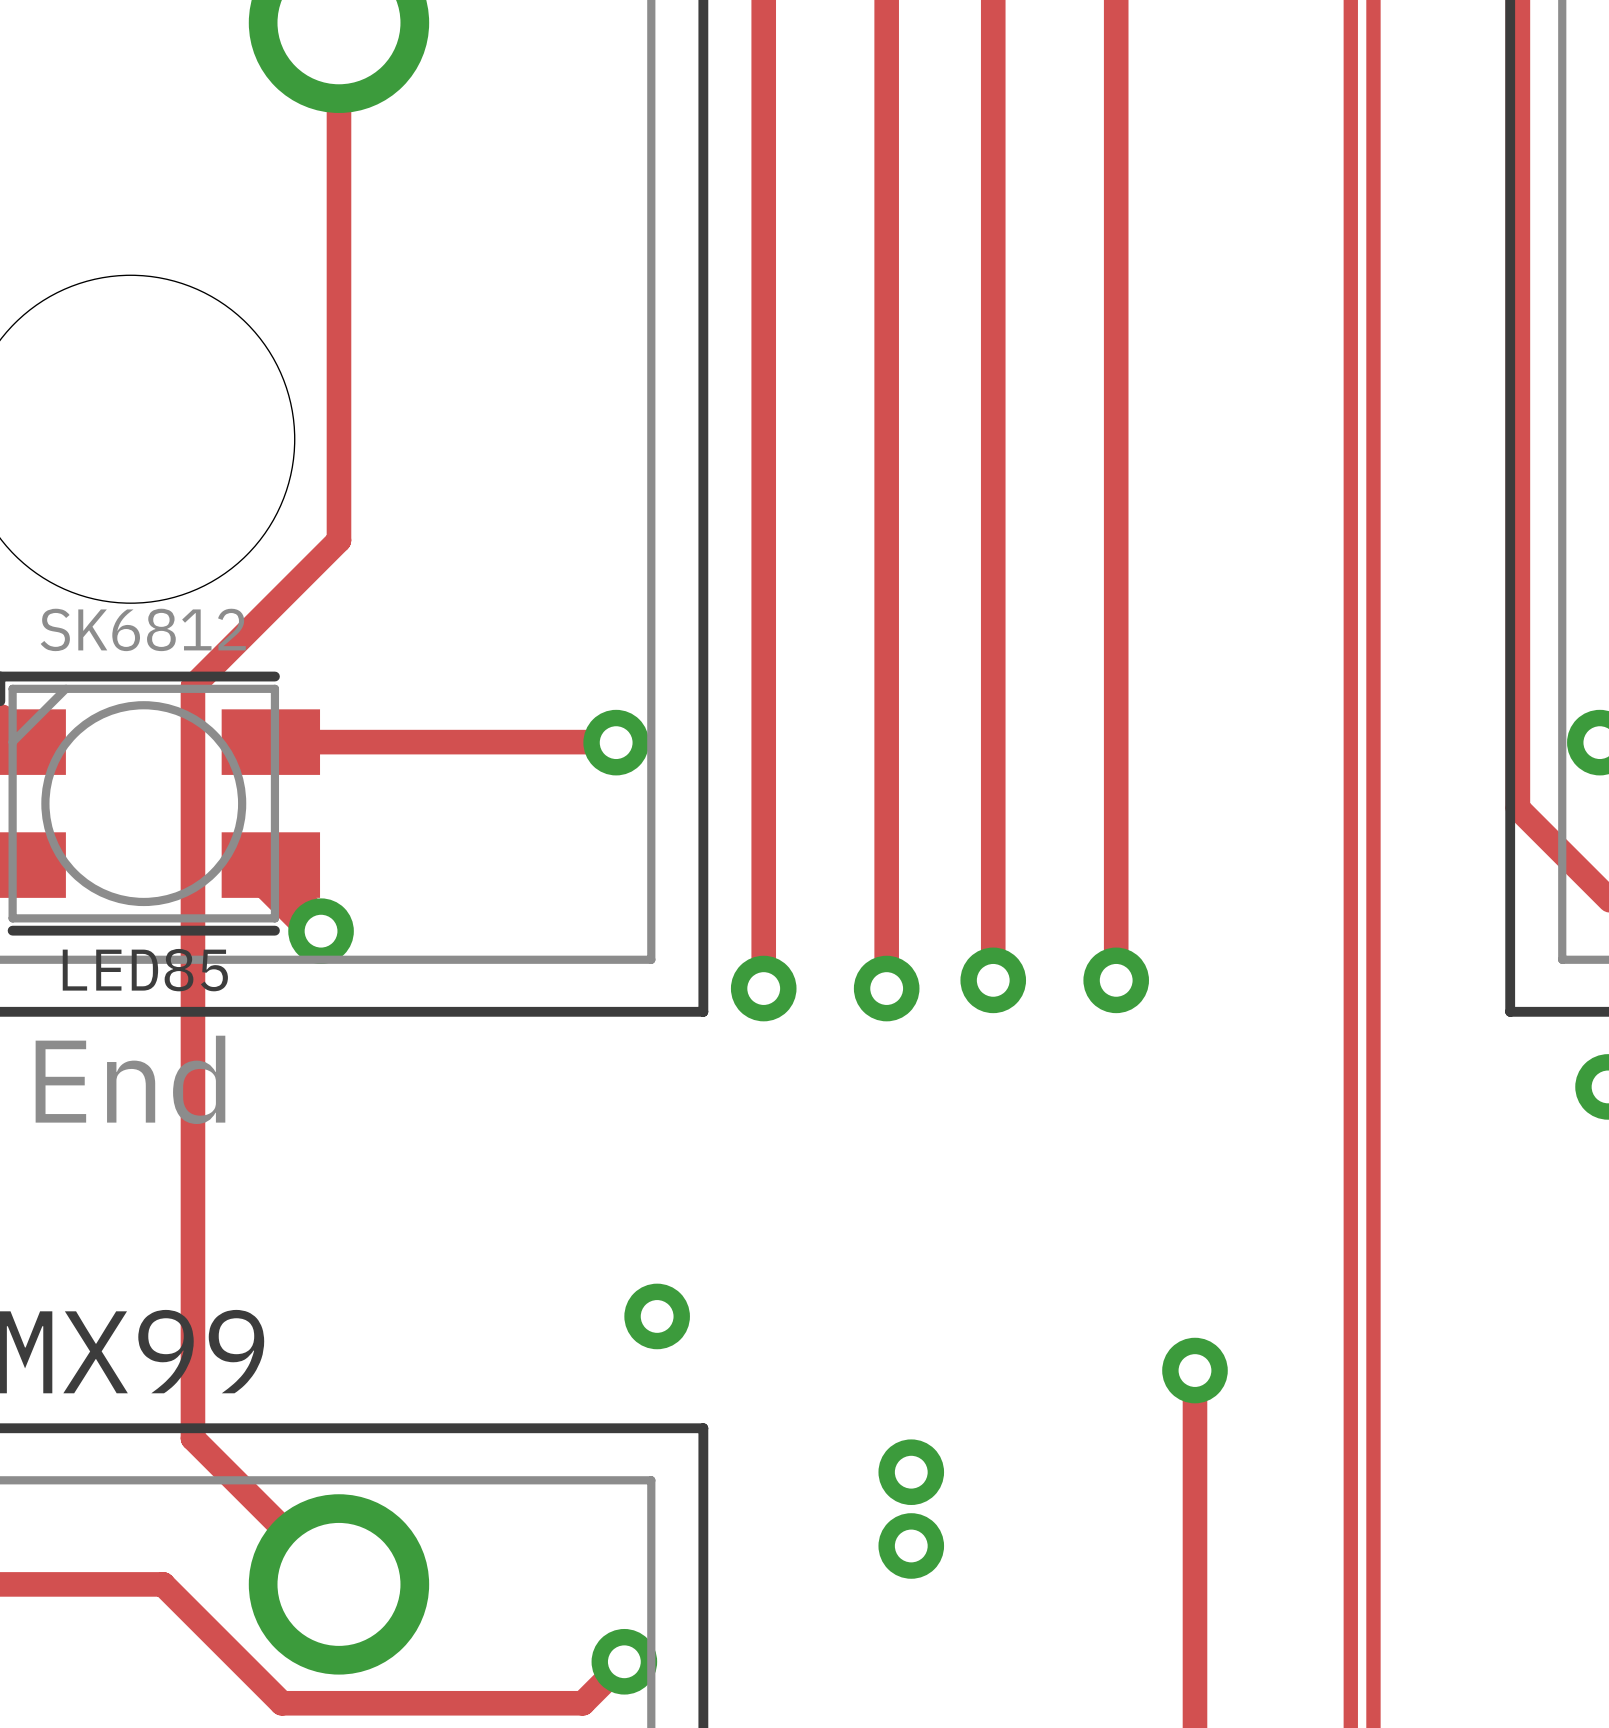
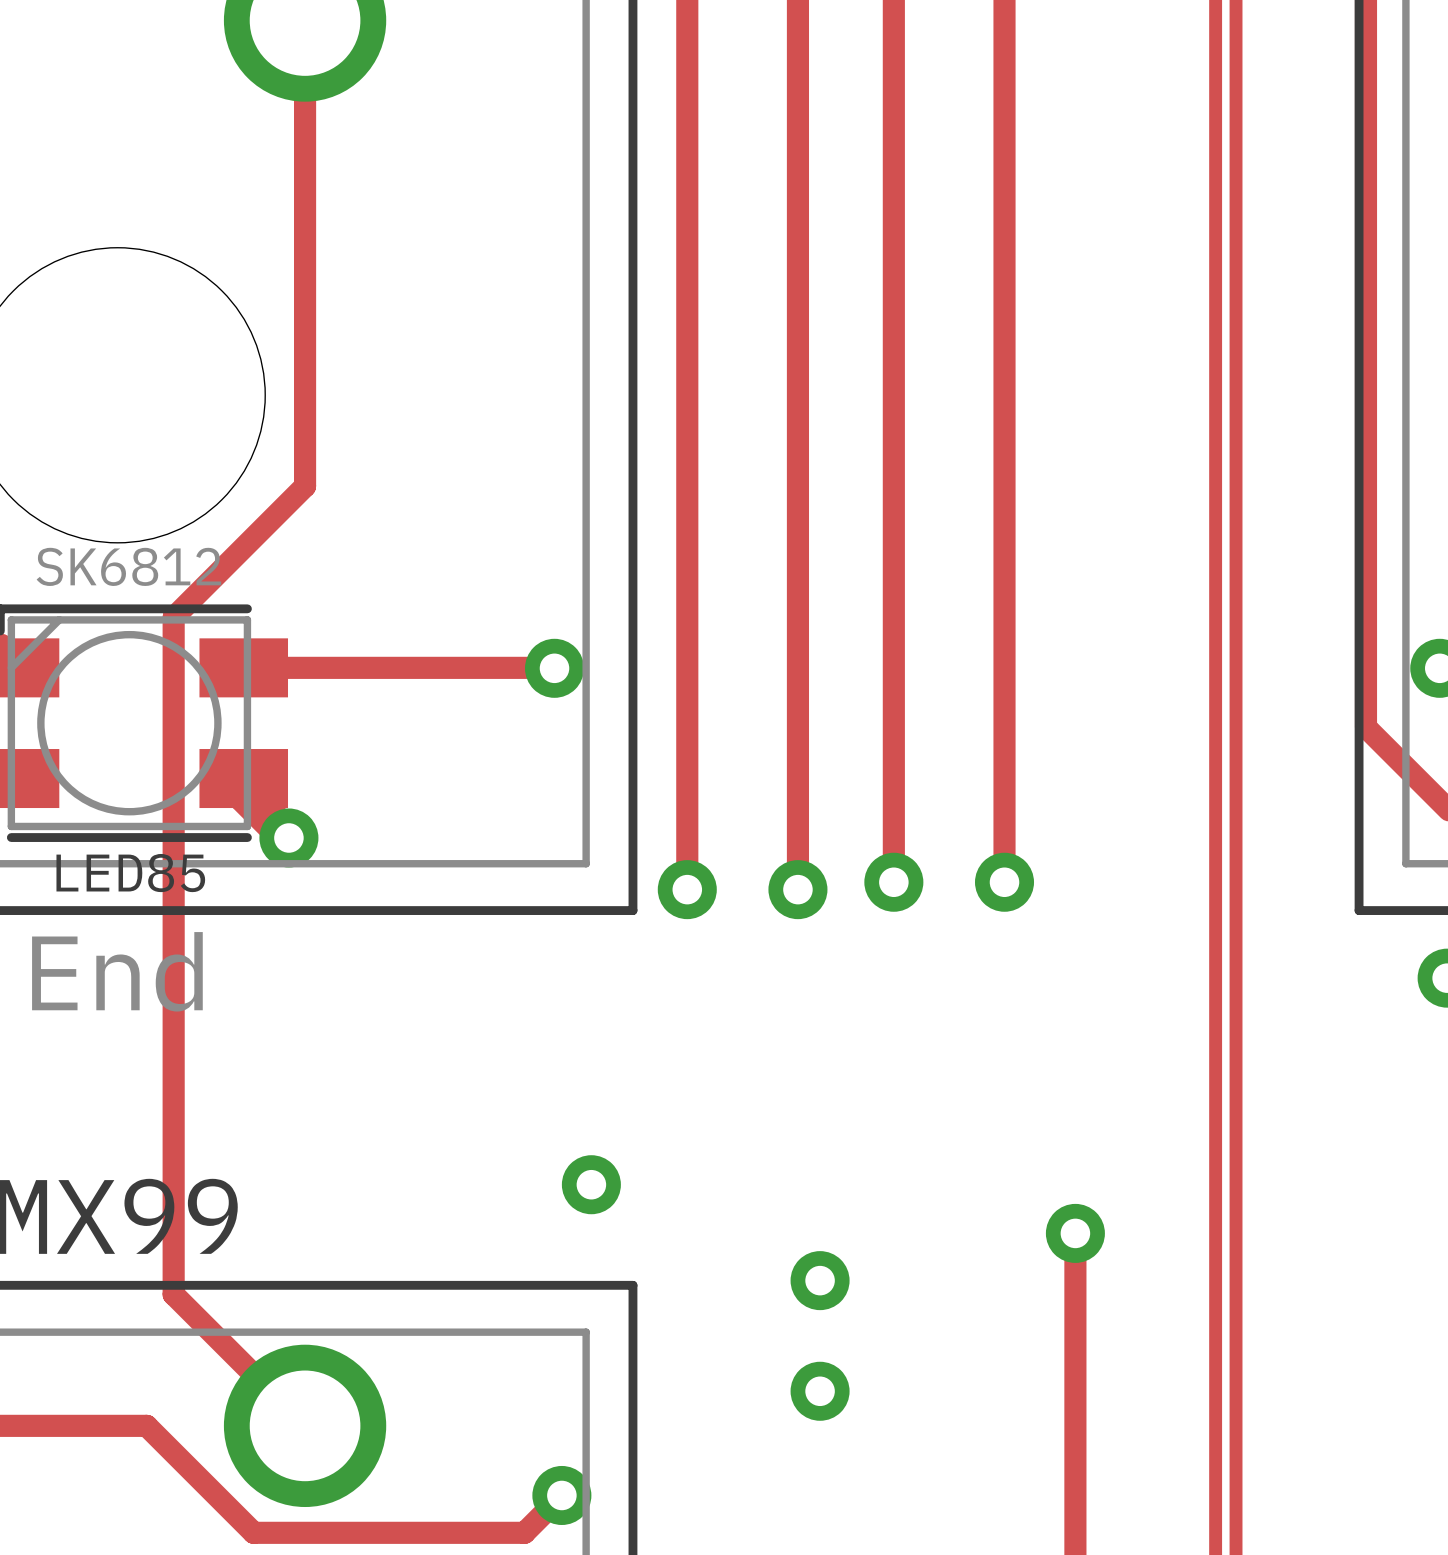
via position: (911, 1472) -> (820, 1280)

